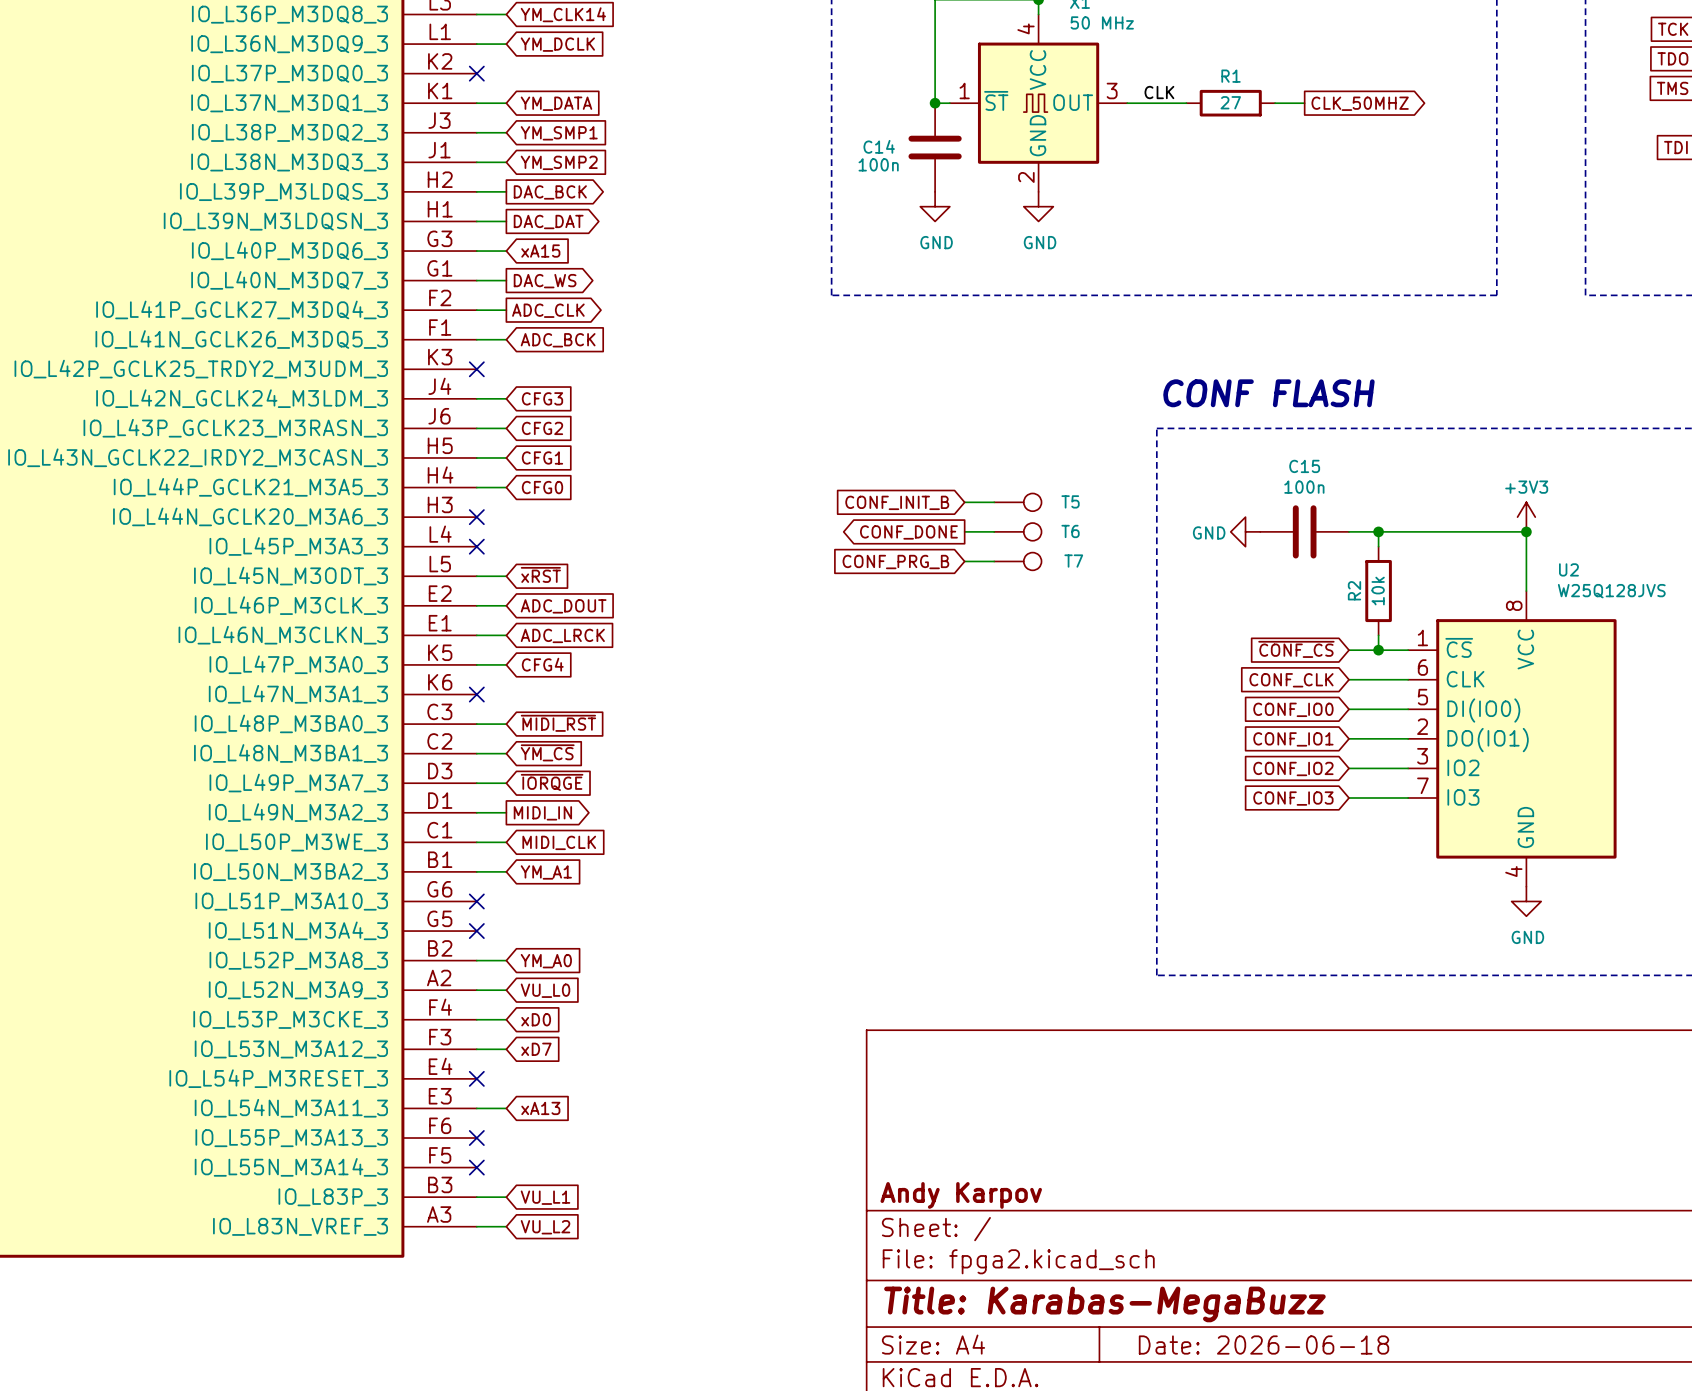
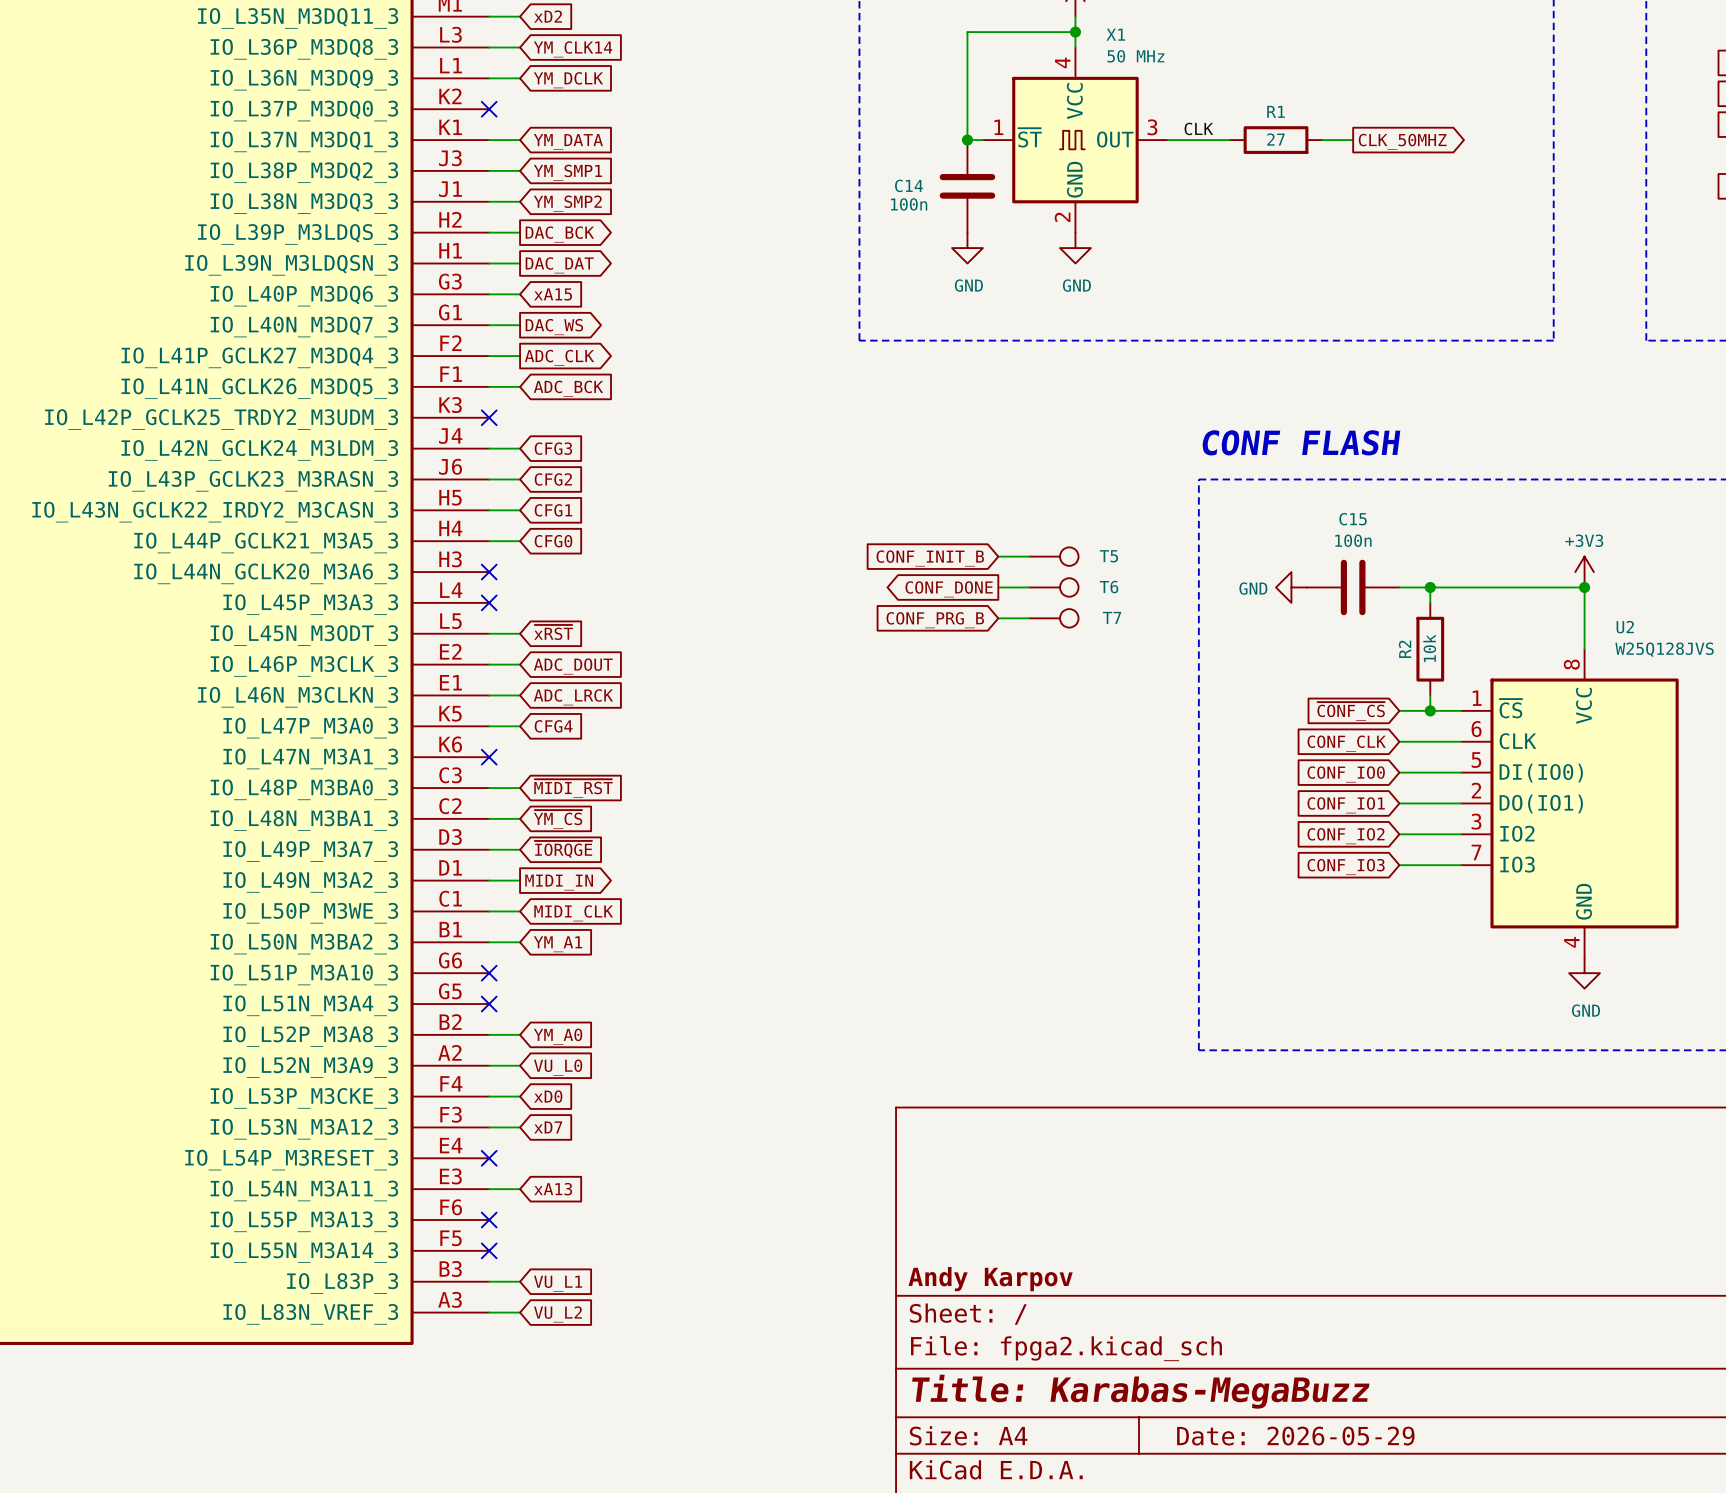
title block: Date: 2026-06-18 (1263, 1345) -> Date: 2026-05-29 (1295, 1436)

